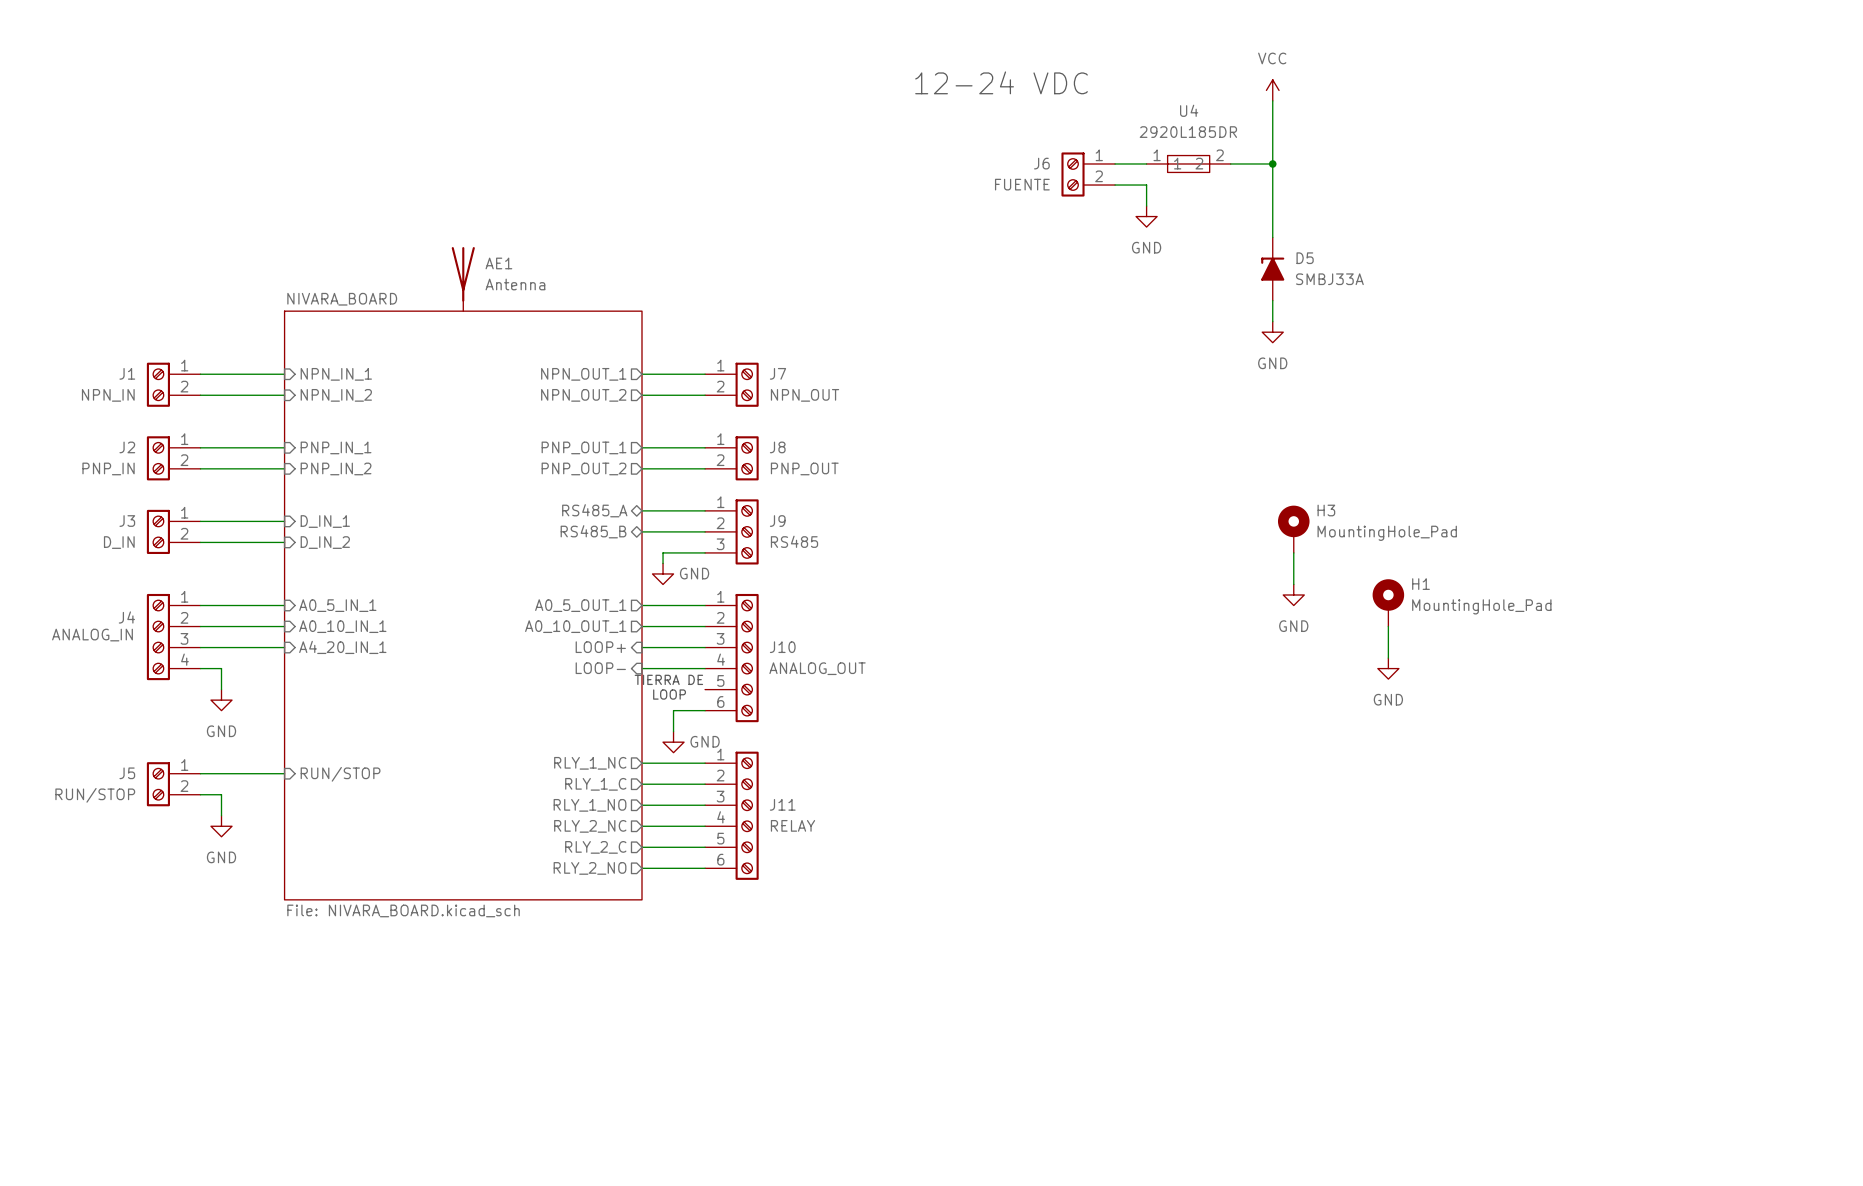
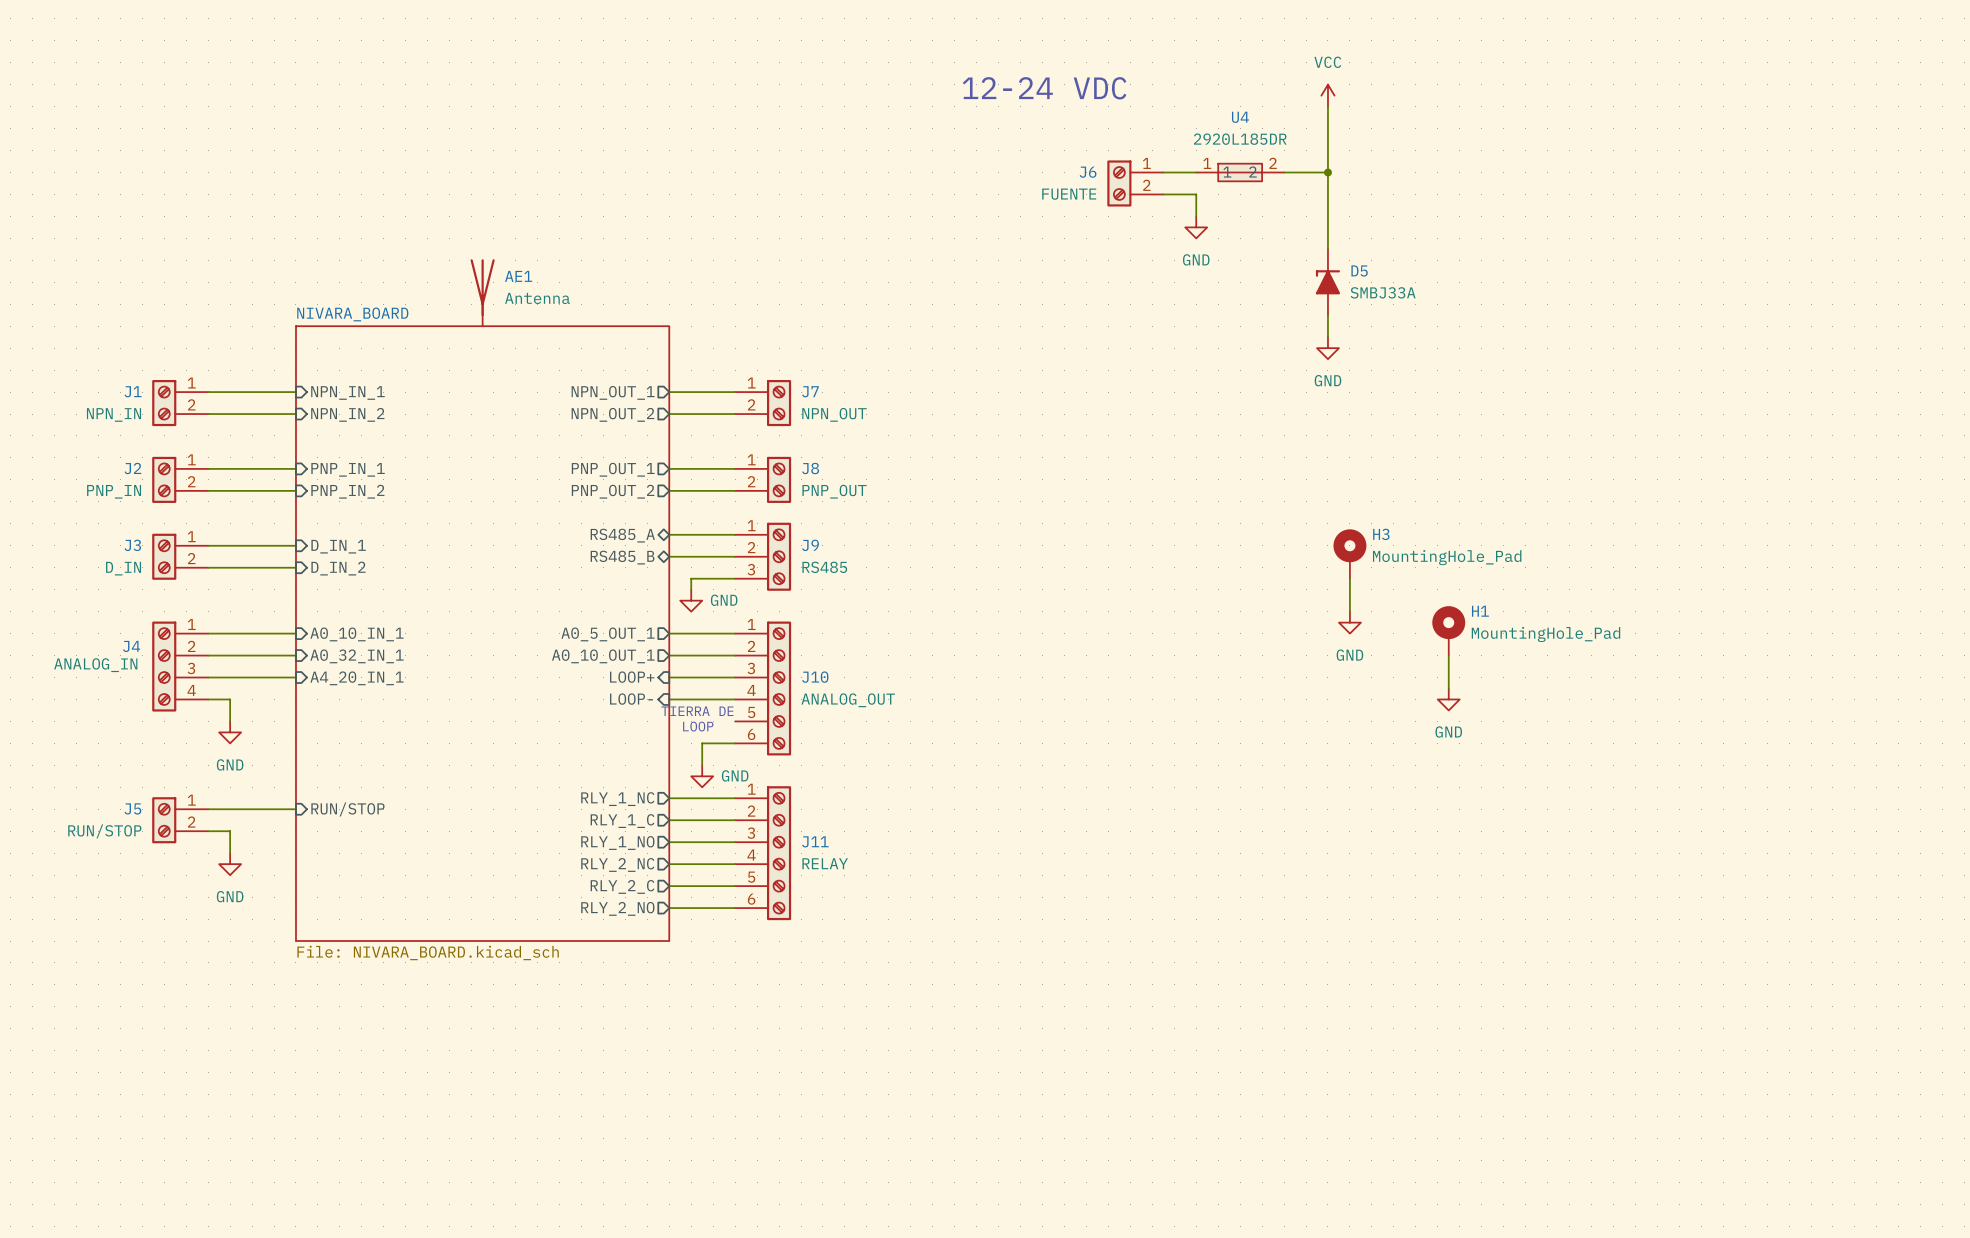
sheet pin: A0_5_IN_1 (337, 605) -> A0_10_IN_1 (357, 634)
sheet pin: A0_10_IN_1 (342, 626) -> A0_32_IN_1 (357, 656)

